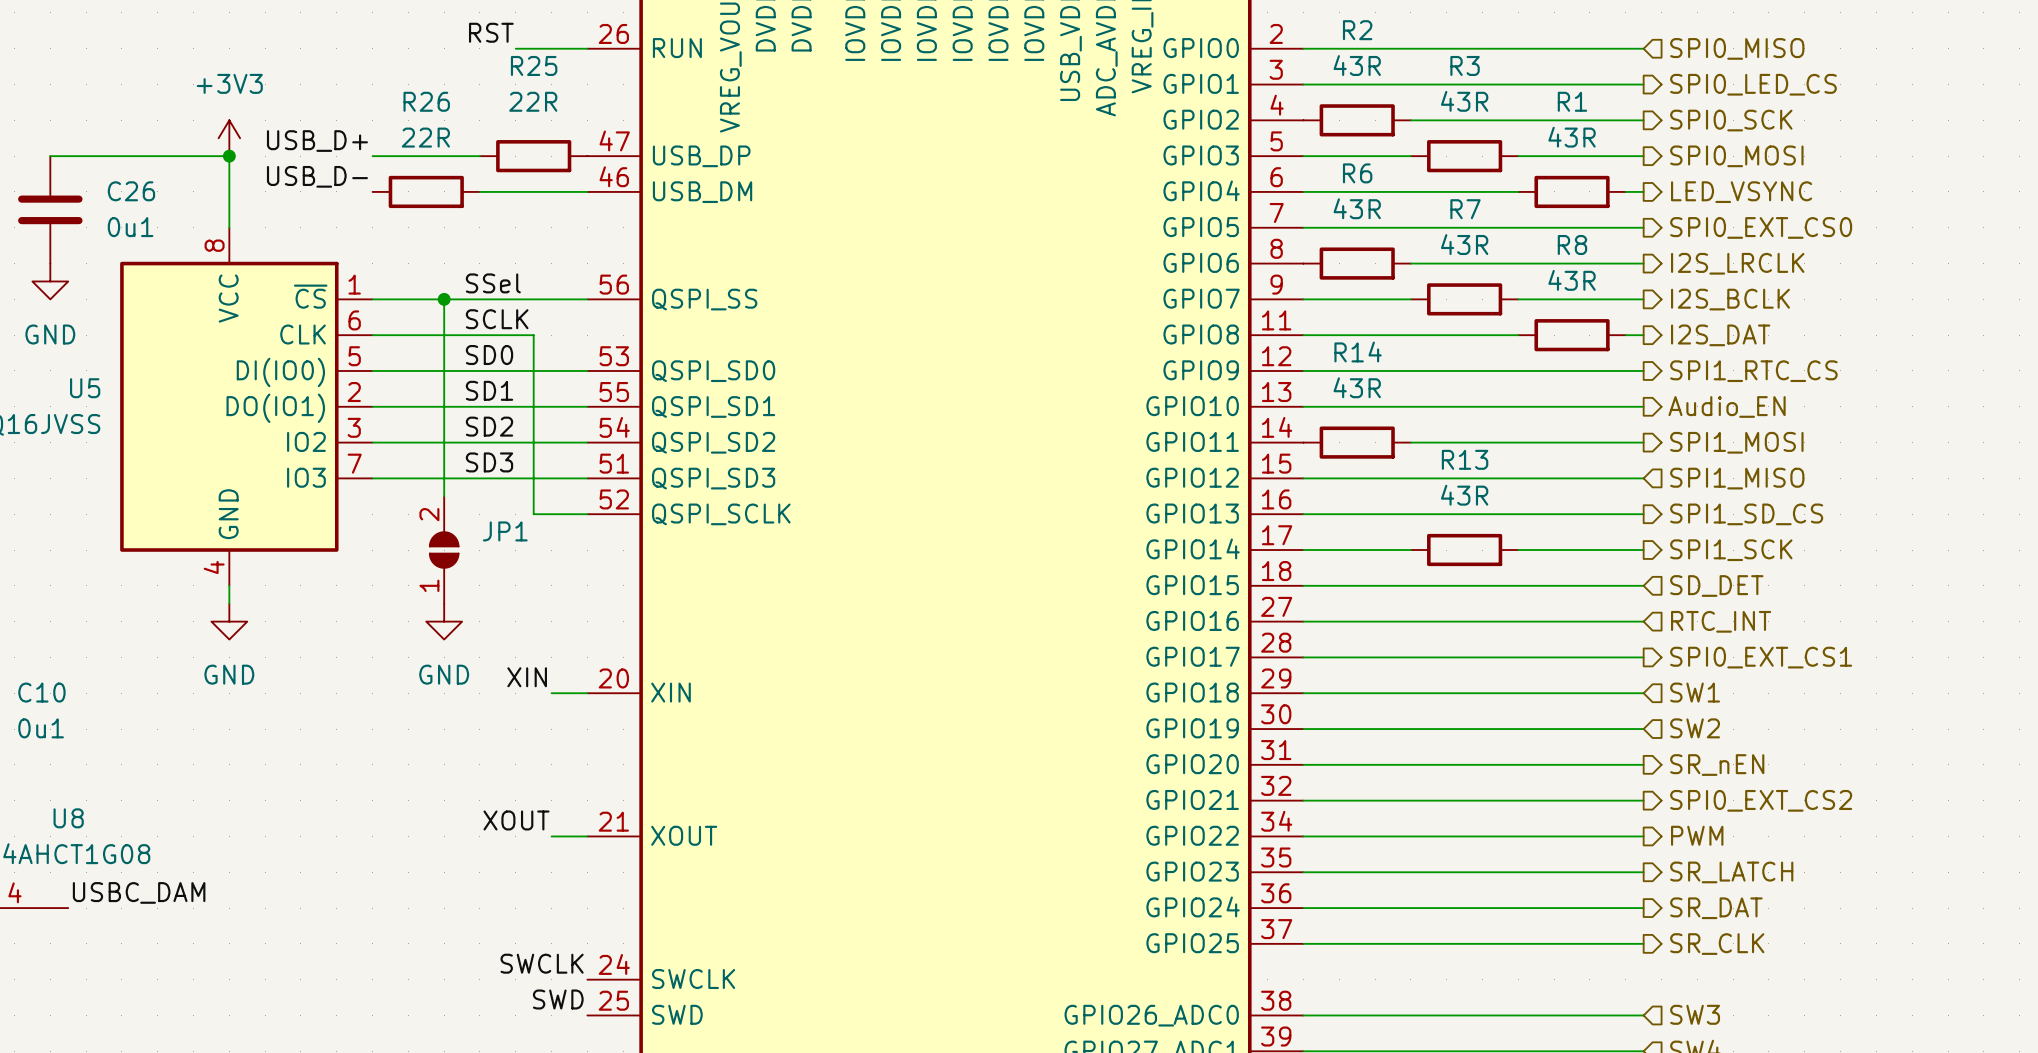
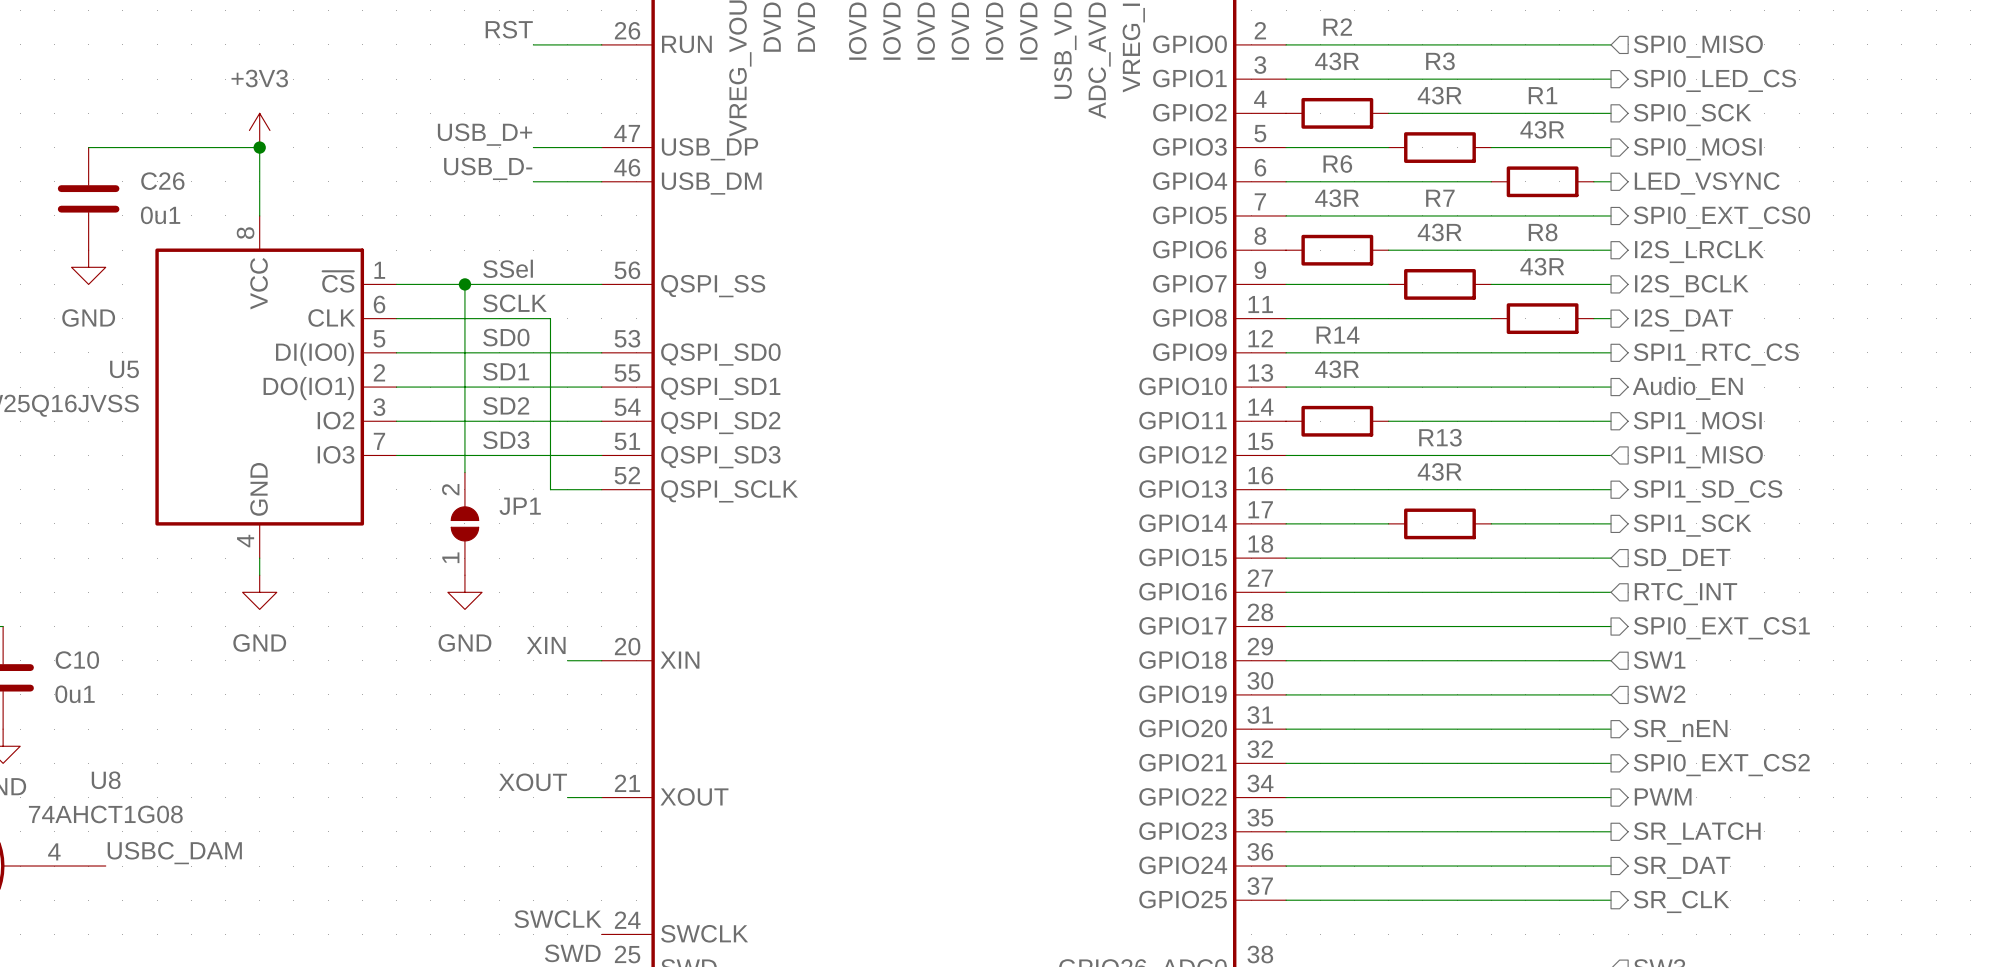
label position: USB_D+ (317, 141) -> USB_D+ (485, 134)
wire: (372, 156) (479, 156) -> none
wire: none -> (533, 147) (601, 147)
R25: 22R (533, 156) -> none
label position: USB_D- (317, 176) -> USB_D- (488, 168)
R26: 22R (426, 191) -> none
wire: (479, 191) (515, 191) -> none

